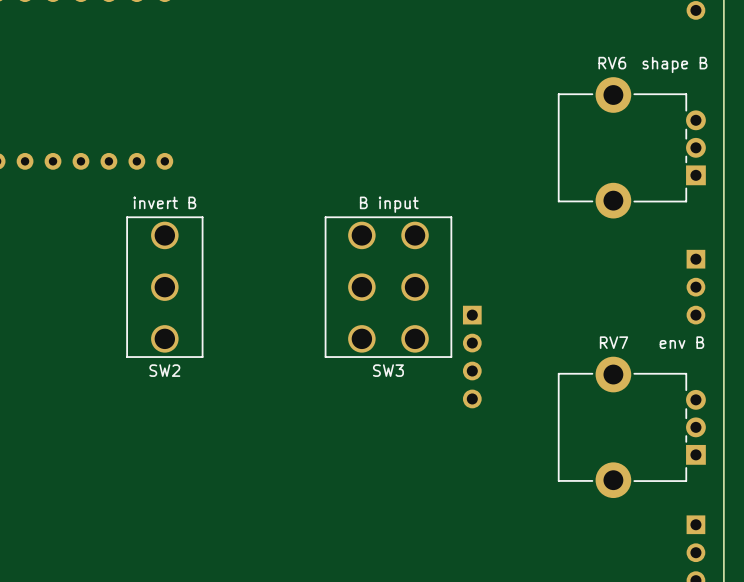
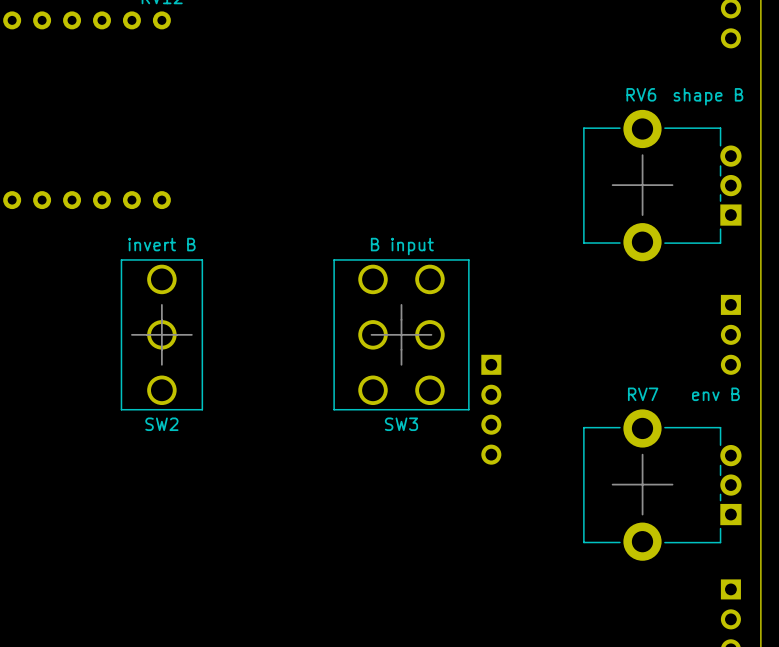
line: none -> (642, 155) (642, 215)
line: none -> (612, 185) (672, 185)
line: none -> (161, 304) (161, 364)
line: none -> (401, 304) (401, 364)
line: none -> (131, 334) (191, 334)
line: none -> (371, 334) (431, 334)
line: none -> (642, 454) (642, 514)
line: none -> (612, 484) (672, 484)

